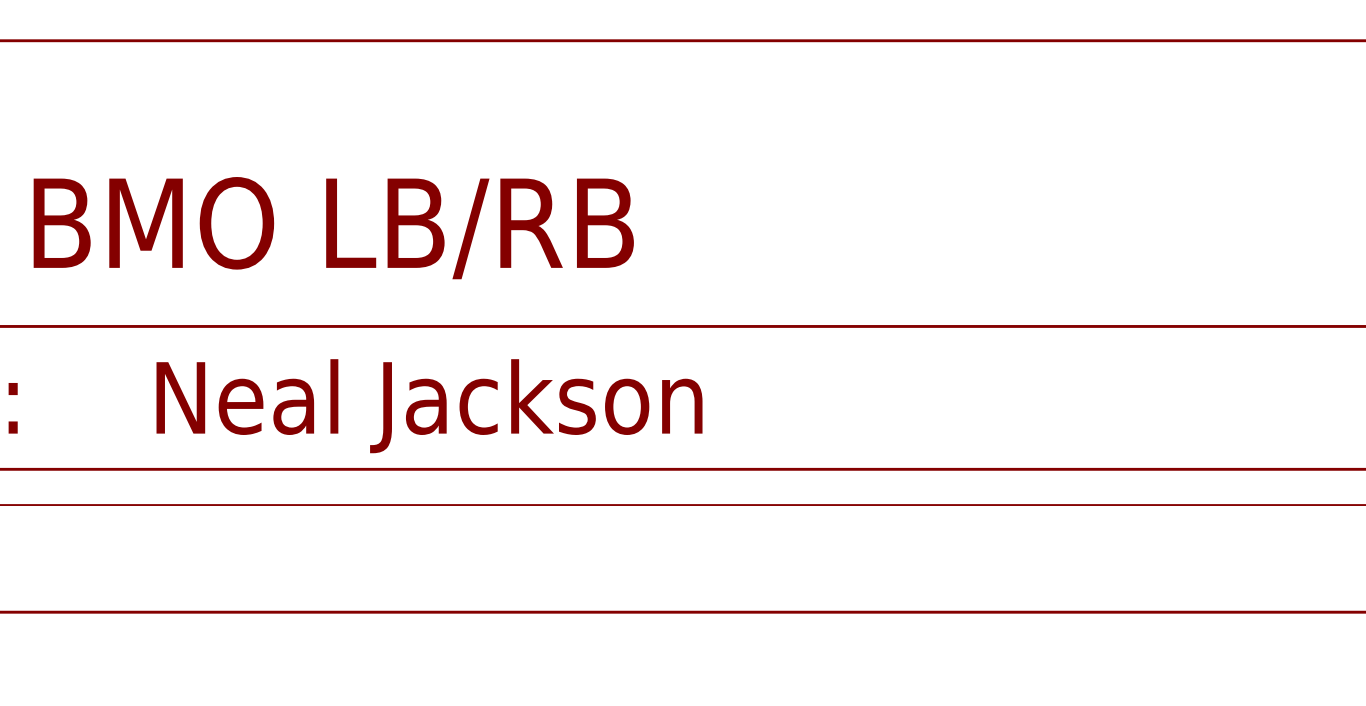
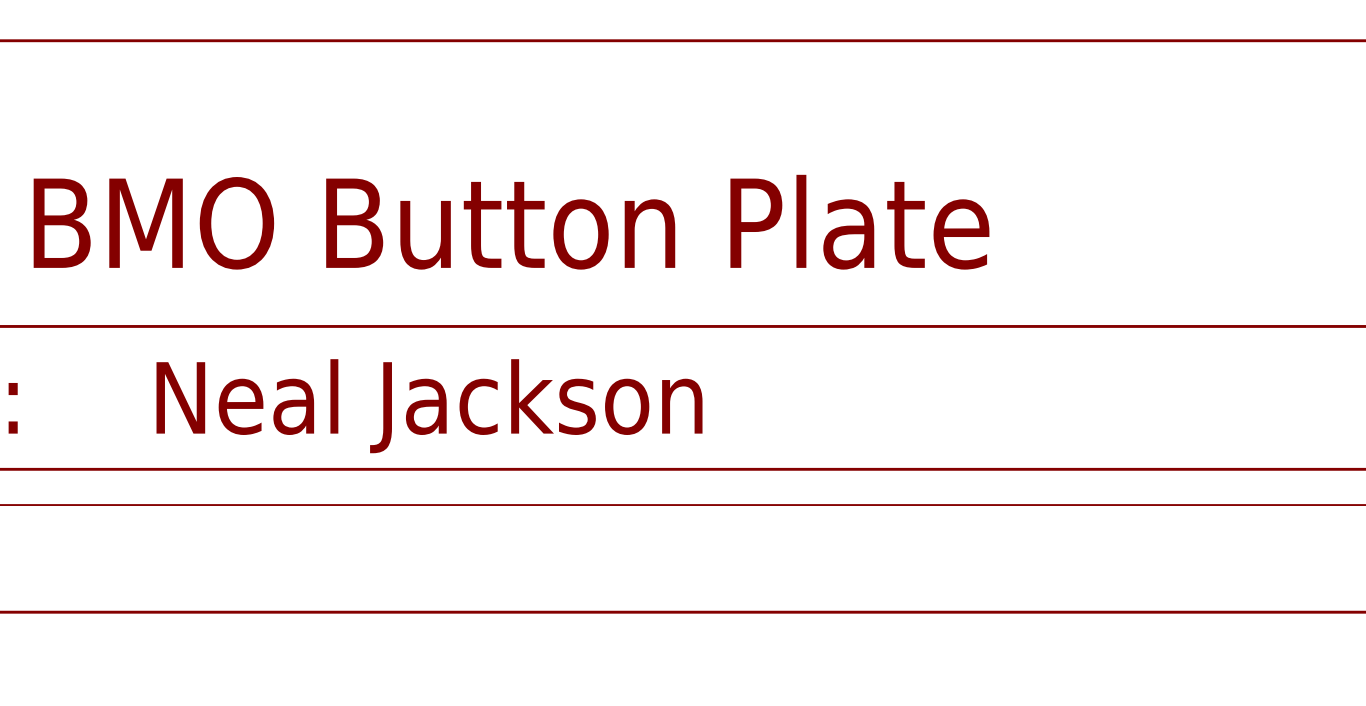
part text: BMO LB/RB (333, 228) -> BMO Button Plate (511, 222)

